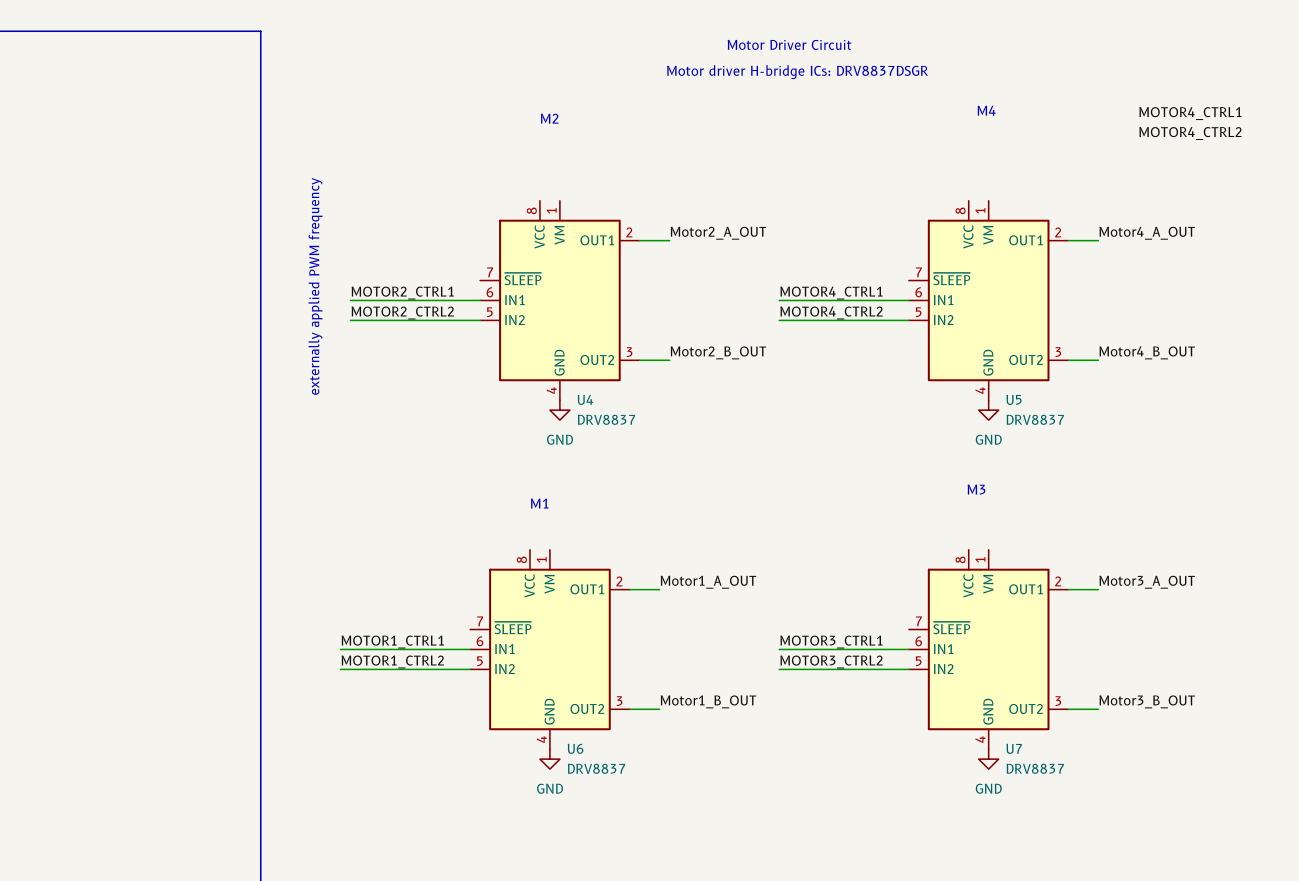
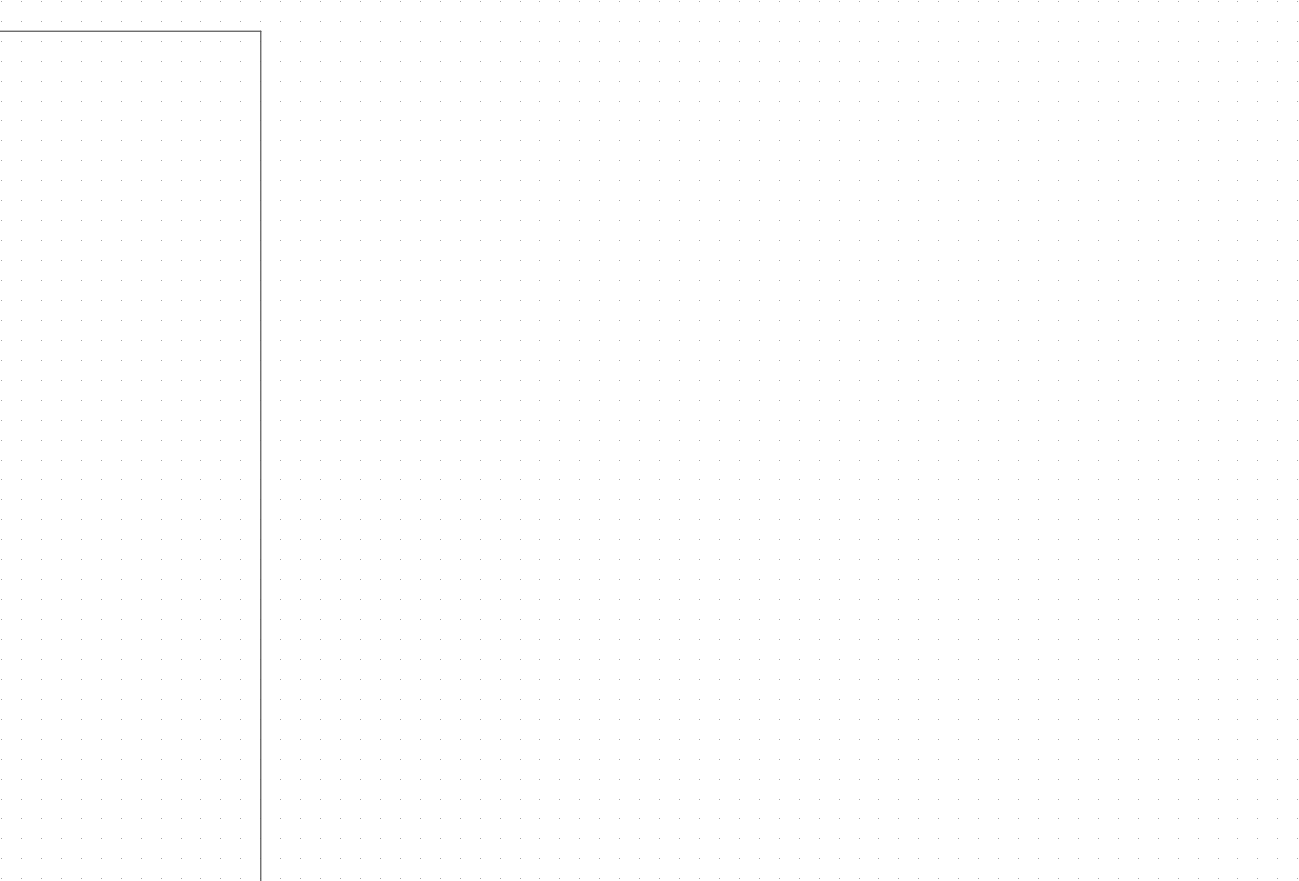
text: Motor Driver Circuit (789, 44) -> none
text: Motor driver H-bridge ICs: DRV8837DSGR (797, 72) -> none
text: M4 (986, 110) -> none
label: MOTOR4_CTRL1 (1190, 113) -> none
text: M2 (549, 118) -> none
label: MOTOR4_CTRL2 (1190, 133) -> none
label: Motor2_A_OUT (718, 233) -> none
label: Motor4_A_OUT (1147, 233) -> none
wire: (639, 240) (669, 240) -> none
wire: (1068, 240) (1098, 240) -> none
text: externally applied PWM frequency (315, 286) -> none
label: MOTOR2_CTRL1 (402, 293) -> none
label: MOTOR4_CTRL1 (831, 293) -> none
wire: (350, 300) (480, 300) -> none
U4: DRV8837 (559, 300) -> none
wire: (779, 300) (908, 300) -> none
U5: DRV8837 (988, 300) -> none
label: MOTOR2_CTRL2 (402, 313) -> none
label: MOTOR4_CTRL2 (831, 313) -> none
wire: (350, 320) (480, 320) -> none
wire: (779, 320) (908, 320) -> none
label: Motor2_B_OUT (718, 352) -> none
label: Motor4_B_OUT (1147, 352) -> none
wire: (639, 360) (669, 360) -> none
wire: (1068, 360) (1098, 360) -> none
power symbol: GND (559, 410) -> none
power symbol: GND (988, 410) -> none
text: M3 (976, 489) -> none
text: M1 (539, 503) -> none
label: Motor1_A_OUT (708, 582) -> none
label: Motor3_A_OUT (1147, 582) -> none
wire: (629, 589) (659, 589) -> none
wire: (1068, 589) (1098, 589) -> none
label: MOTOR1_CTRL1 (392, 642) -> none
label: MOTOR3_CTRL1 (831, 642) -> none
wire: (340, 649) (470, 649) -> none
U6: DRV8837 (549, 649) -> none
wire: (779, 649) (908, 649) -> none
U7: DRV8837 (988, 649) -> none
label: MOTOR1_CTRL2 (392, 661) -> none
label: MOTOR3_CTRL2 (831, 661) -> none
wire: (340, 669) (470, 669) -> none
wire: (779, 669) (908, 669) -> none
label: Motor1_B_OUT (708, 701) -> none
label: Motor3_B_OUT (1147, 701) -> none
wire: (629, 709) (659, 709) -> none
wire: (1068, 709) (1098, 709) -> none
power symbol: GND (549, 759) -> none
power symbol: GND (988, 759) -> none

